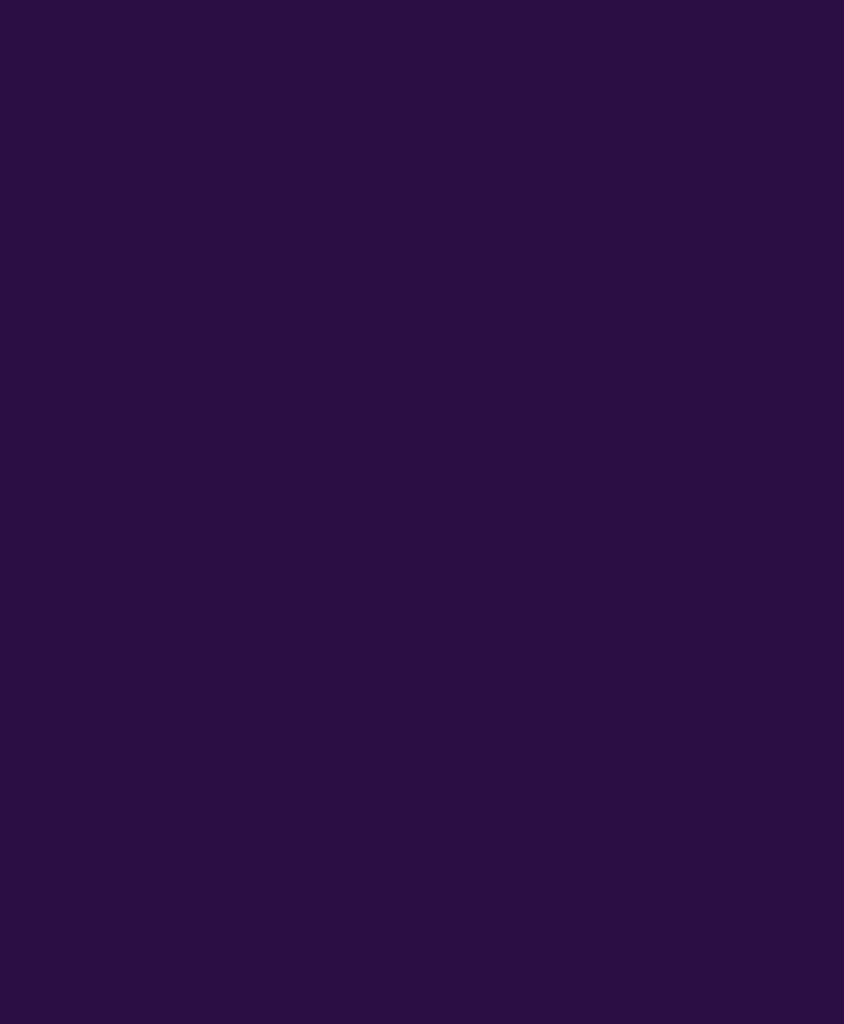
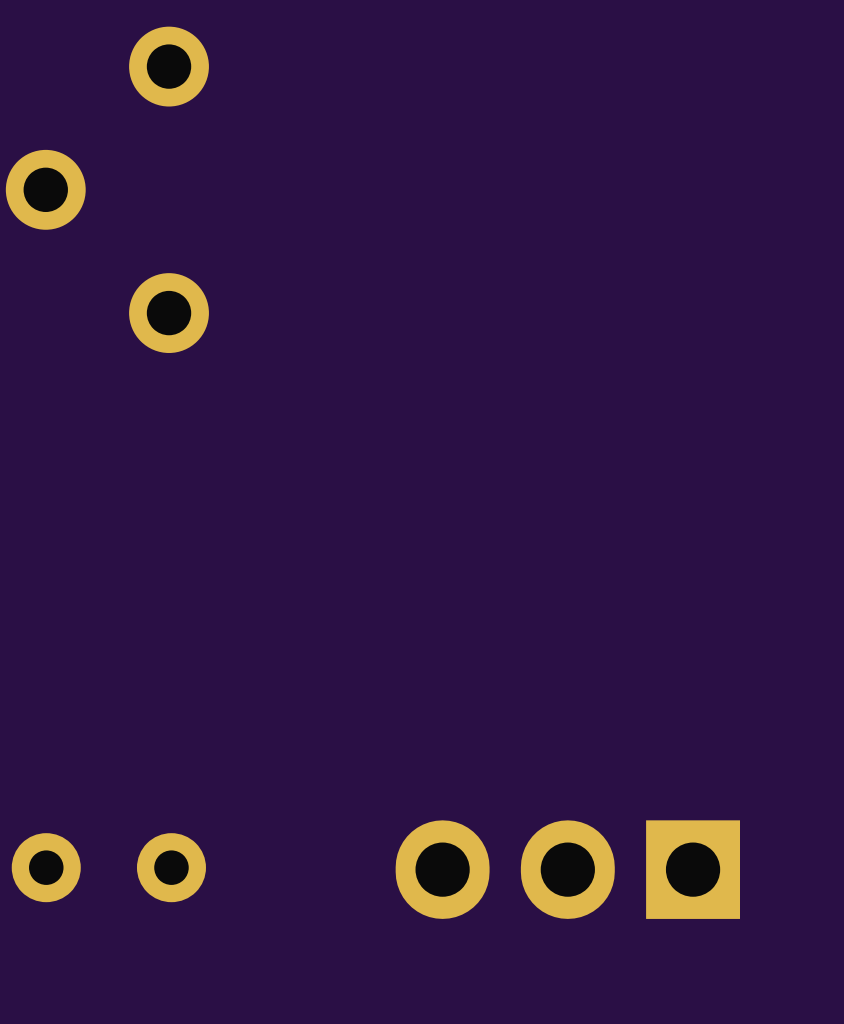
part: none -> (107, 189)
part: none -> (108, 867)
part: none -> (567, 869)

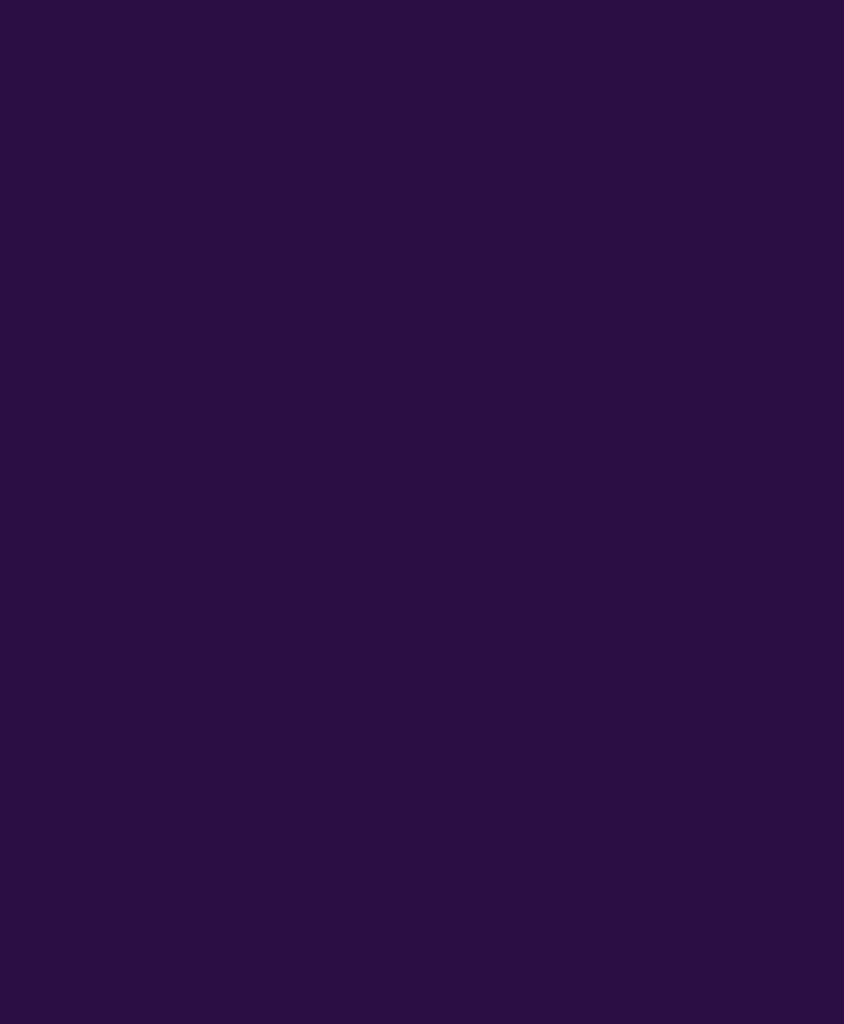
part: (107, 189) -> none
part: (108, 867) -> none
part: (567, 869) -> none

